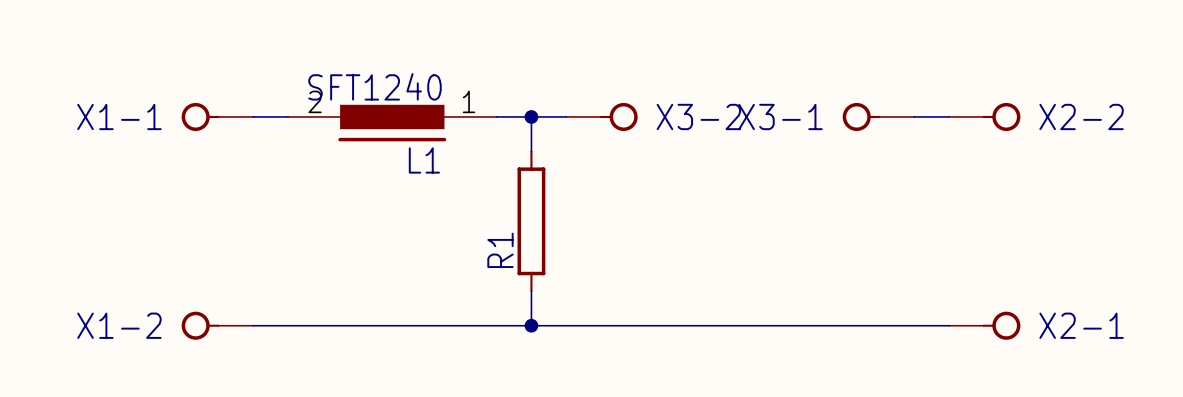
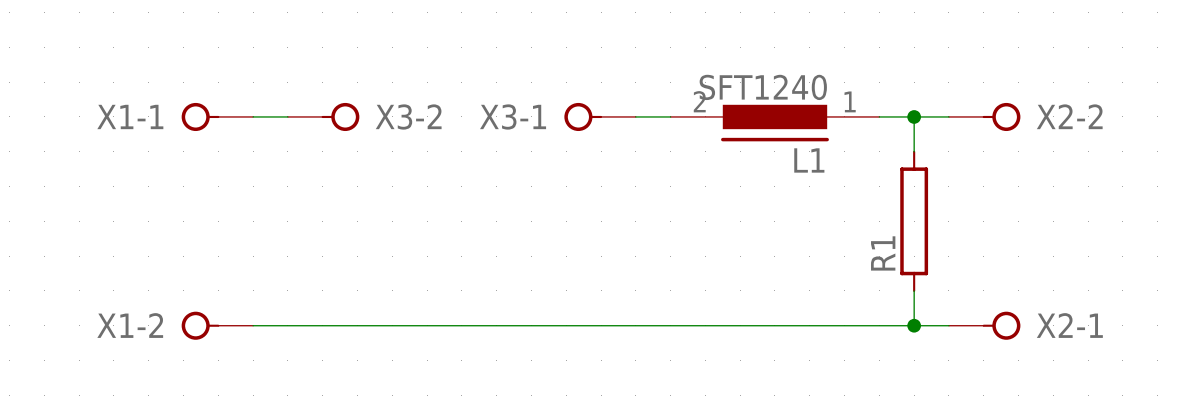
wire: (496, 116) (566, 116) -> none
wire: (531, 116) (531, 151) -> none
junction: (531, 116) -> none
X3-2 position: (601, 116) -> (323, 116)
wire: none -> (635, 116) (670, 116)
X3-1 position: (878, 116) -> (600, 116)
wire: none -> (879, 116) (914, 116) (914, 151)
junction: none -> (914, 116)
L1 position: (392, 123) -> (774, 123)
R1 position: (531, 221) -> (914, 221)
wire: (531, 290) (531, 325) -> none
wire: none -> (914, 290) (914, 325)
junction: (531, 325) -> none
junction: none -> (914, 325)

